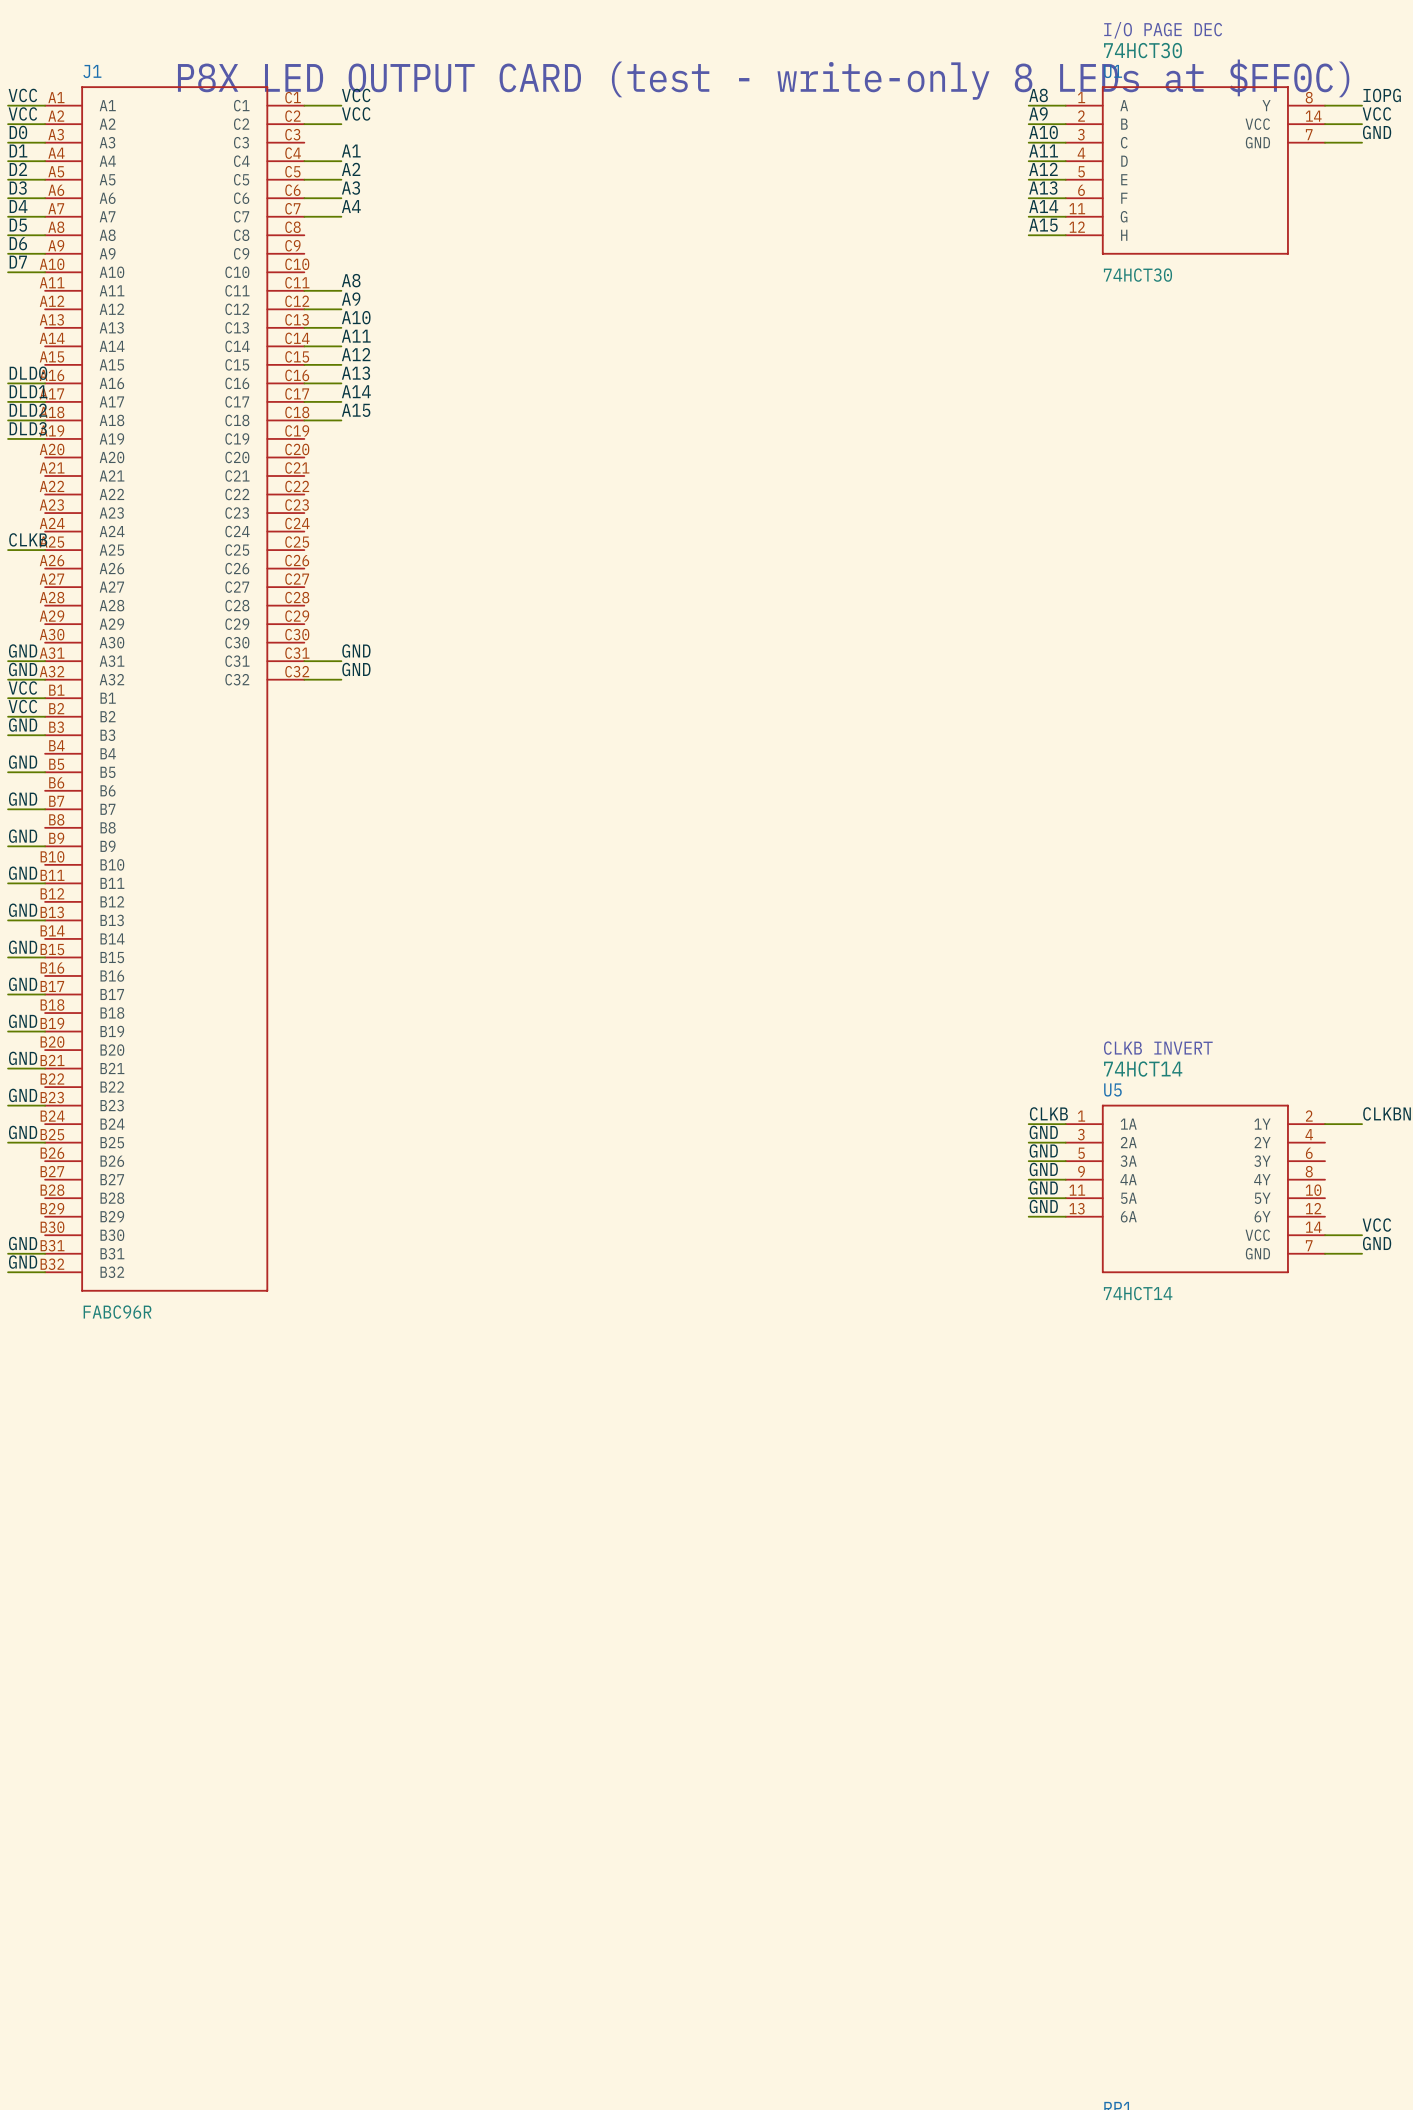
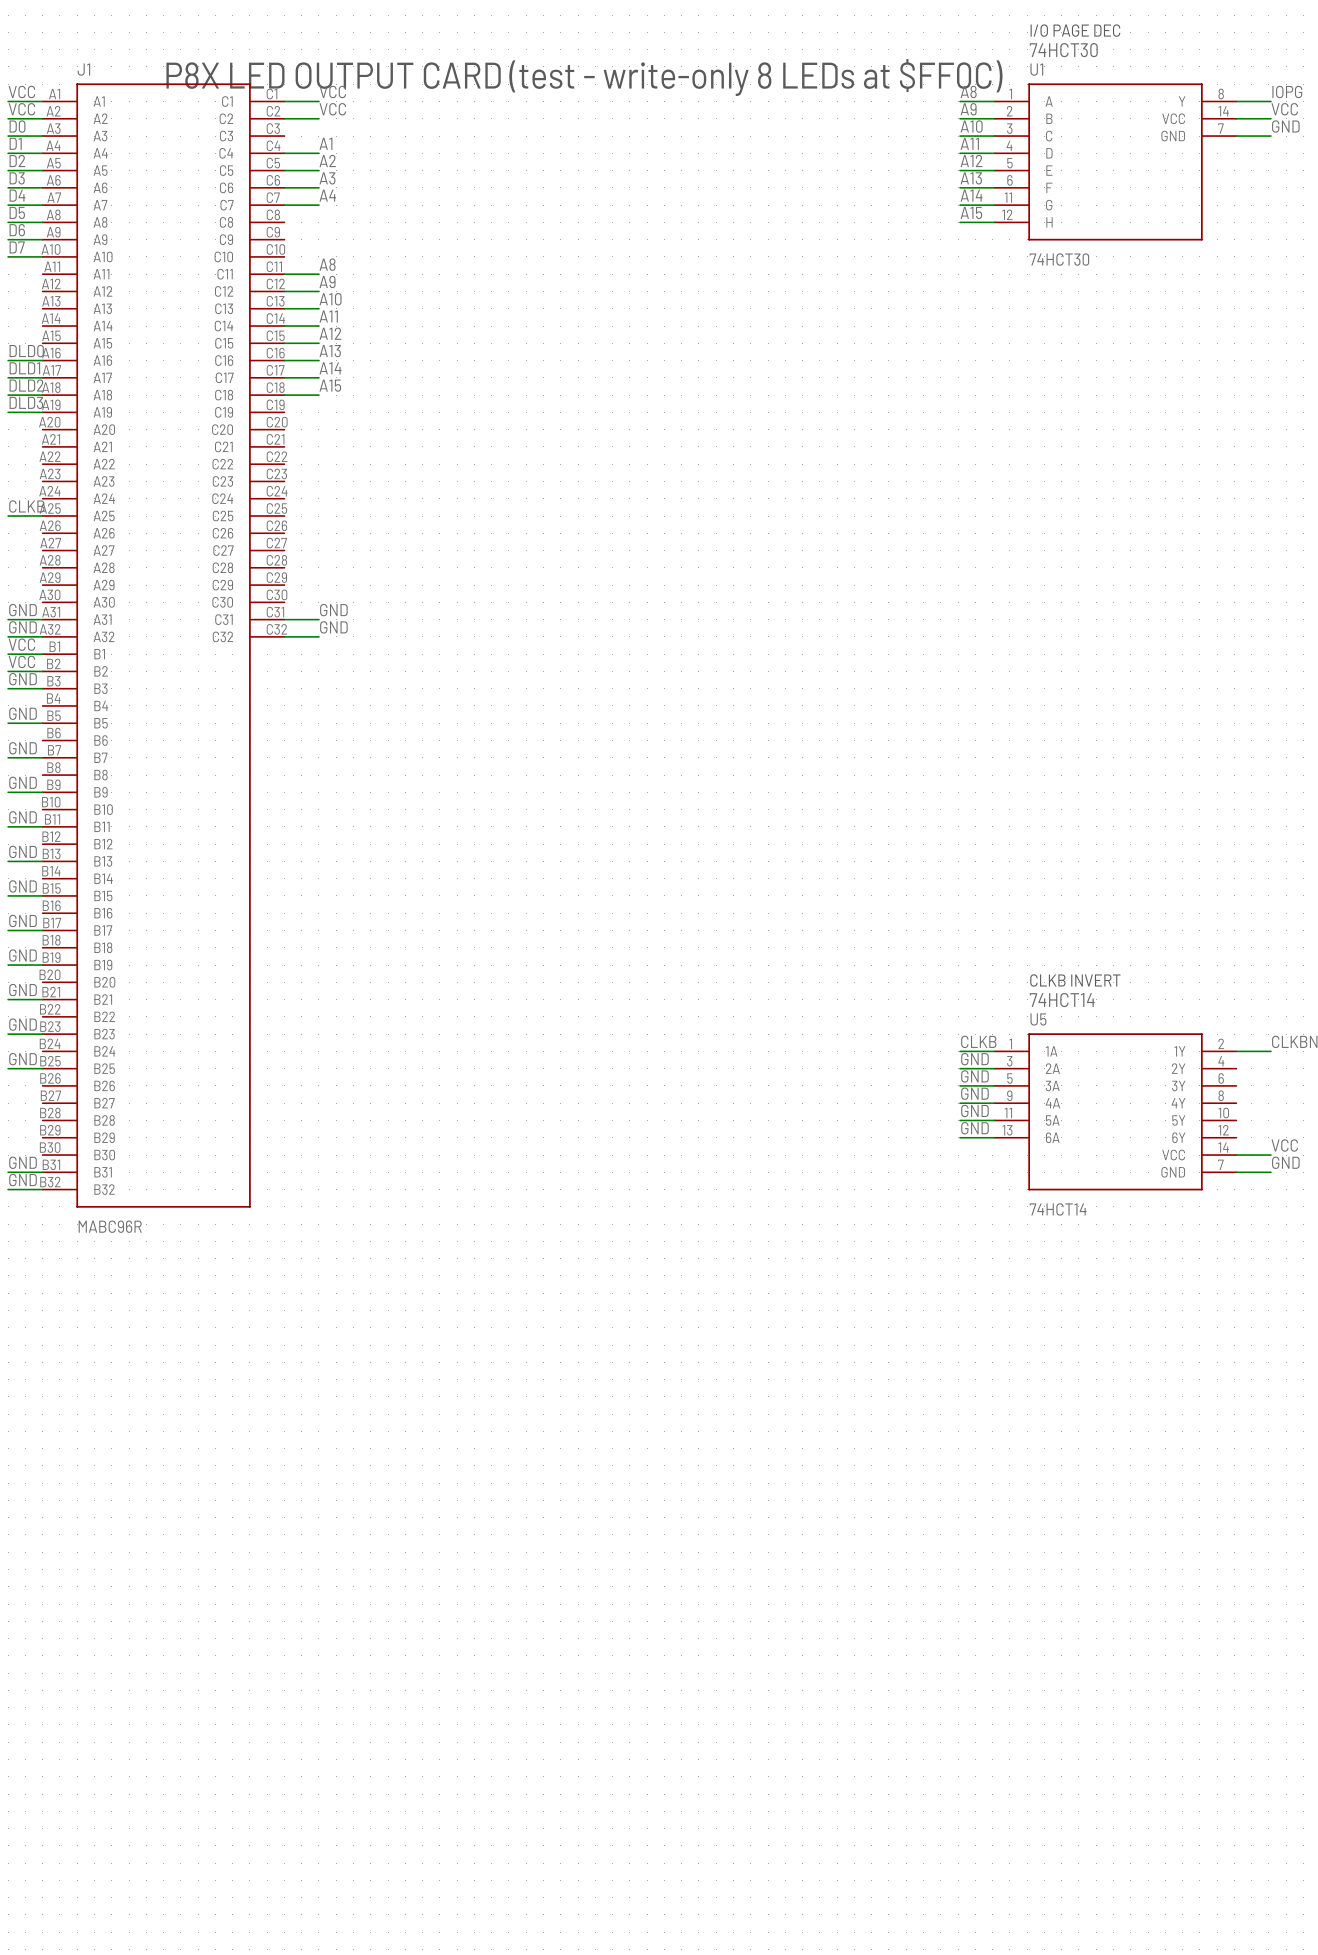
J1 value: FABC96R (117, 1312) -> MABC96R (110, 1226)

